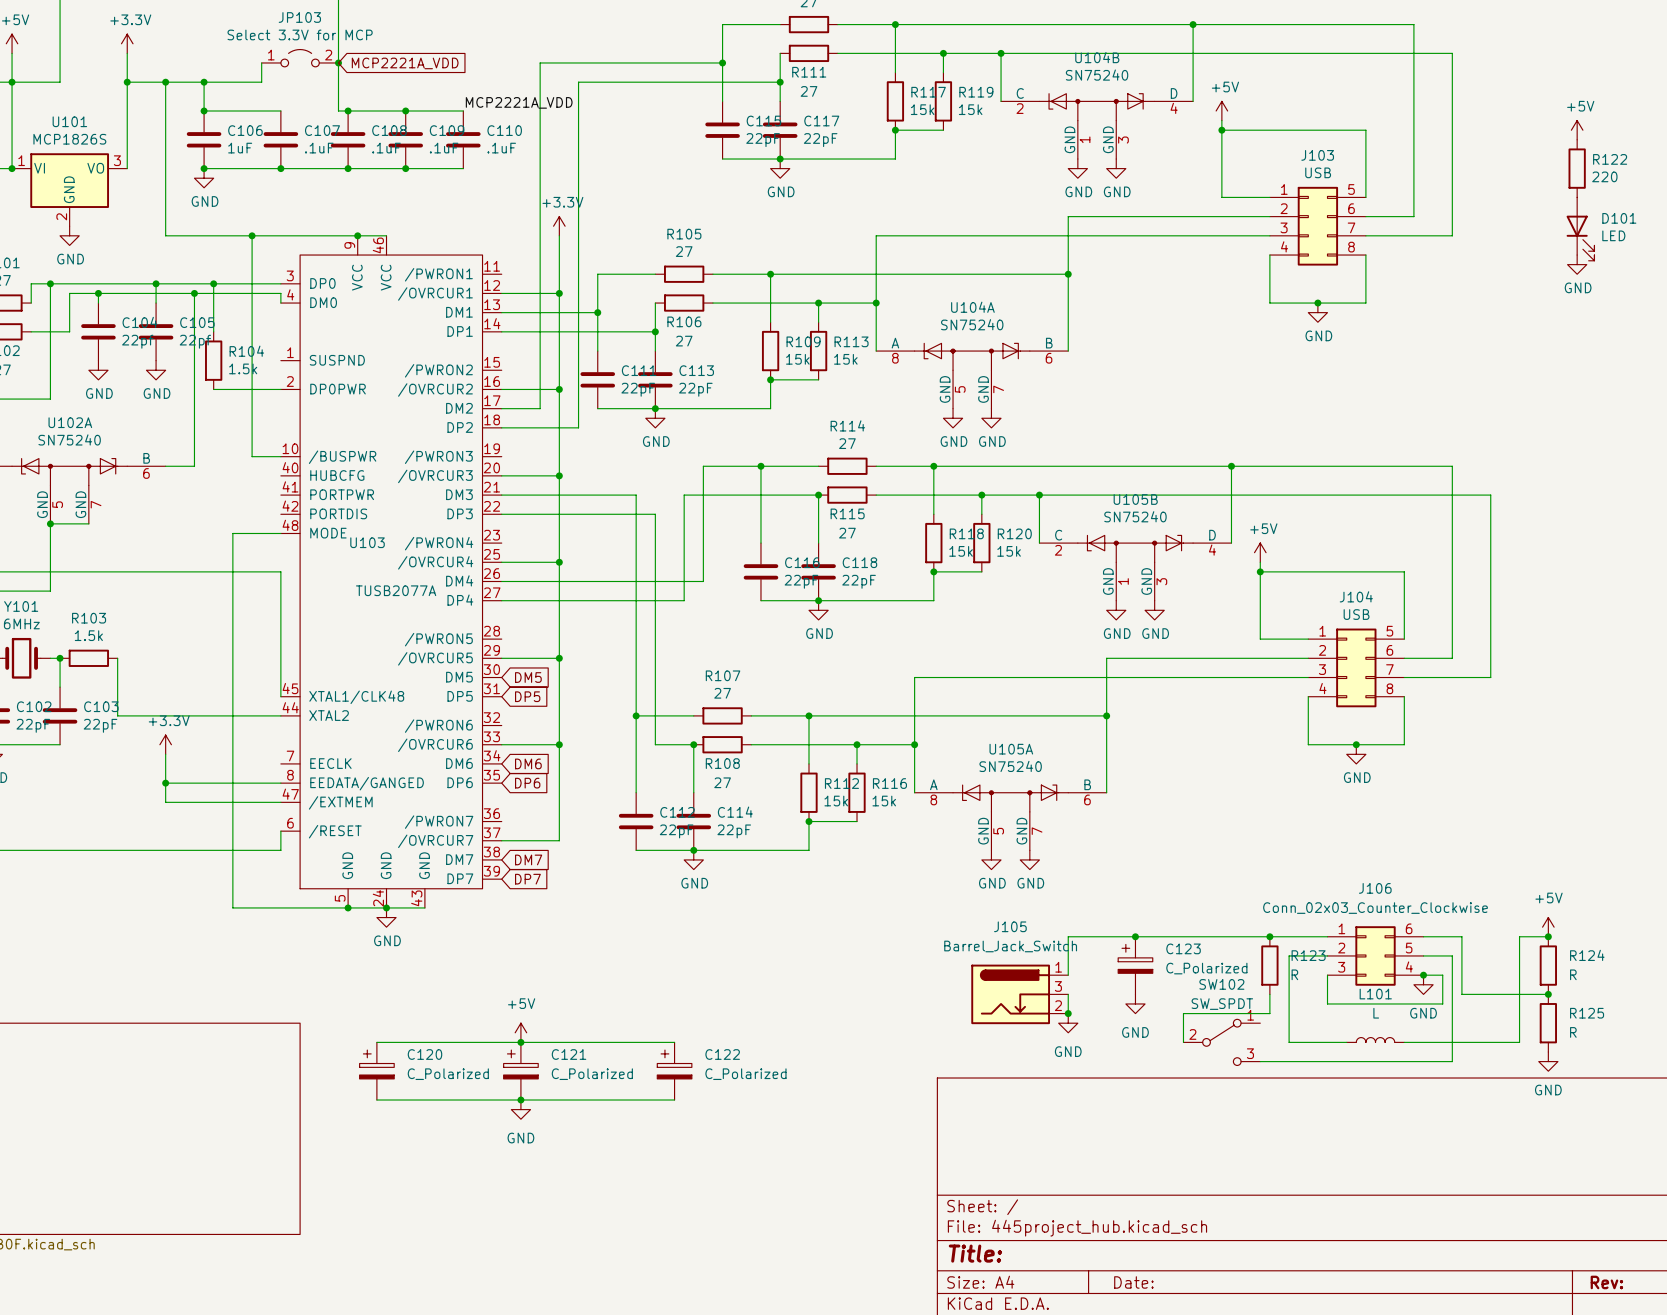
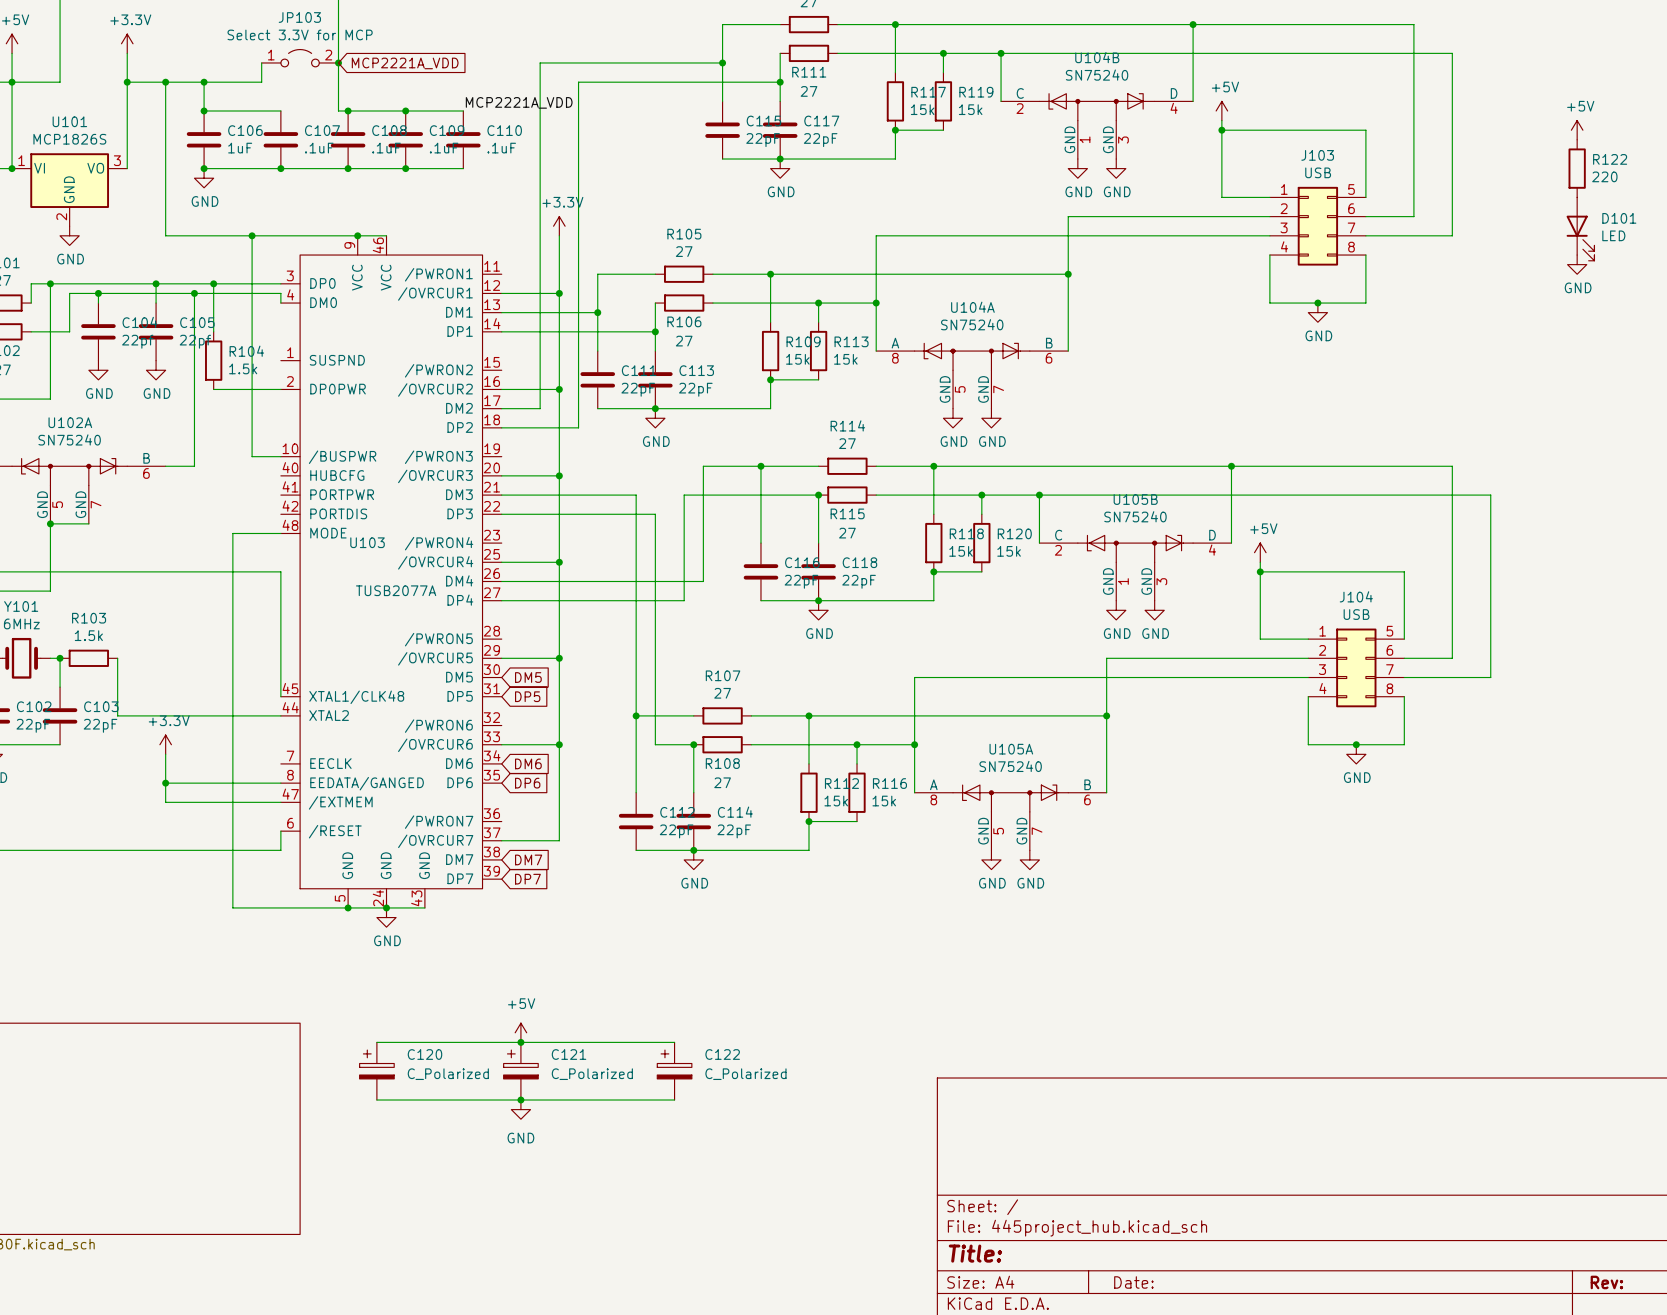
power symbol: +5V (1548, 927) -> none
junction: (1135, 936) -> none
junction: (1269, 936) -> none
wire: (1327, 936) (1068, 936) (1068, 975) -> none
wire: (1423, 936) (1461, 936) (1461, 994) (1548, 994) -> none
wire: (1548, 936) (1519, 936) (1519, 1042) (1404, 1042) -> none
junction: (1548, 936) -> none
wire: (1327, 955) (1289, 955) (1289, 1042) (1346, 1042) -> none
J106: Conn_02x03_Counter_Clockwise (1375, 955) -> none
wire: (1423, 955) (1452, 955) (1452, 1061) (1260, 1061) -> none
C123: C_Polarized (1135, 965) -> none
R123: R (1269, 965) -> none
R124: R (1548, 965) -> none
wire: (1327, 975) (1327, 1003) (1442, 1003) (1442, 975) (1423, 975) -> none
junction: (1423, 975) -> none
power symbol: GND (1423, 984) -> none
J105: Barrel_Jack_Switch (1019, 994) -> none
wire: (1068, 994) (1068, 1013) -> none
wire: (1269, 994) (1269, 1013) (1183, 1013) (1183, 1042) -> none
junction: (1548, 994) -> none
power symbol: GND (1135, 1003) -> none
junction: (1068, 1013) -> none
power symbol: GND (1068, 1023) -> none
R125: R (1548, 1023) -> none
L101: L (1375, 1039) -> none
SW102: SW_SPDT (1221, 1042) -> none
power symbol: GND (1548, 1061) -> none

